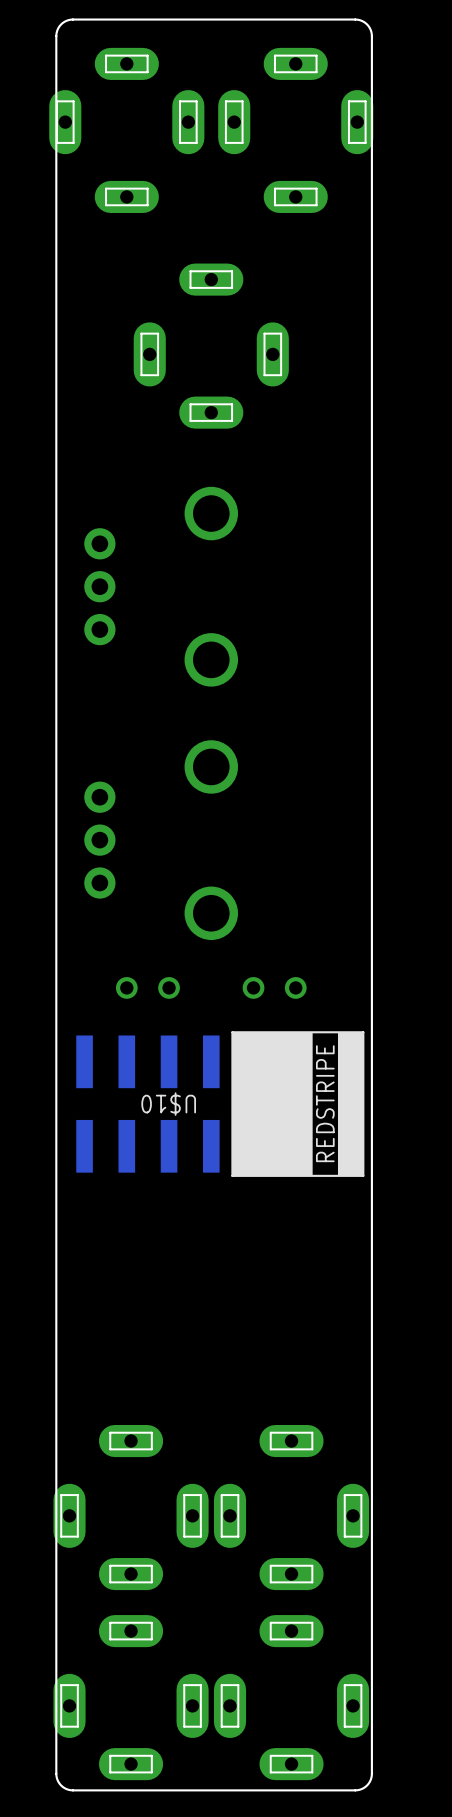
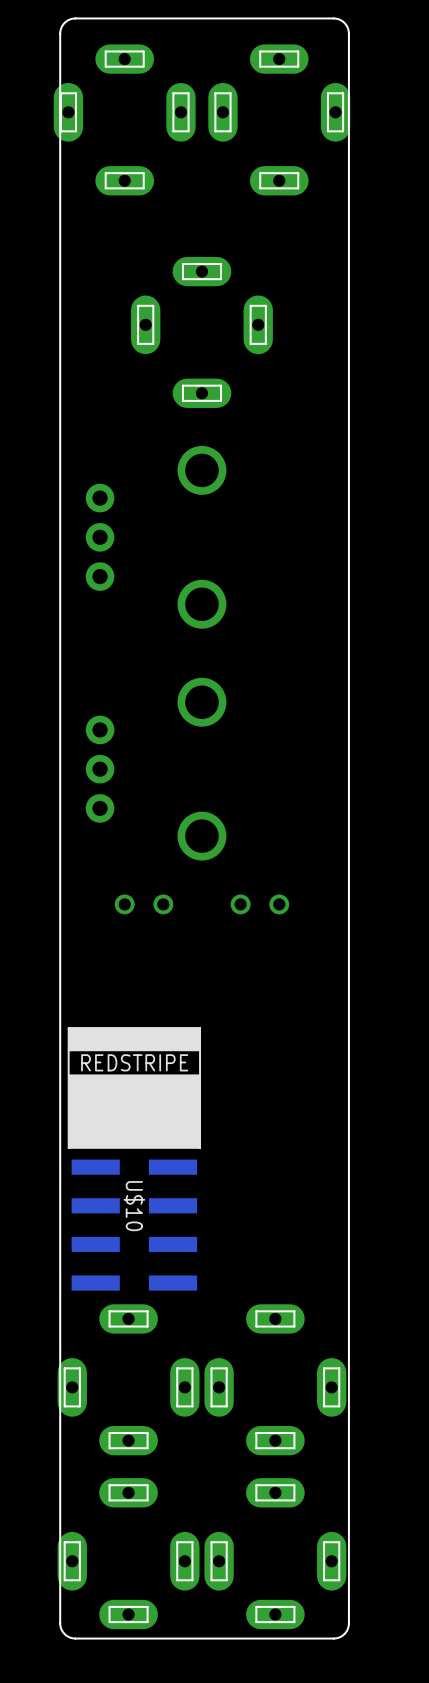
part rotation: 0° (211, 346) -> 180° (201, 332)
U$10 footprint: [76, 1031, 365, 1177] -> [67, 1027, 202, 1291]
U$10 name position: U$10 (168, 1104) -> U$10 (134, 1206)

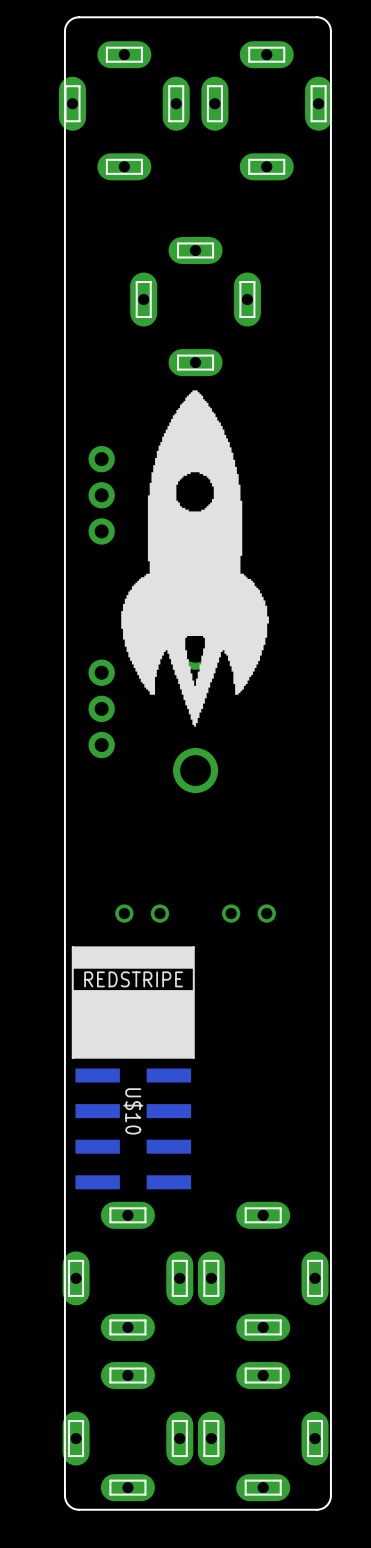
drawing: none -> [121, 390, 269, 727]
part: (144, 904) -> none
part: (259, 904) -> none
part: none -> (142, 913)
part: none -> (248, 913)

